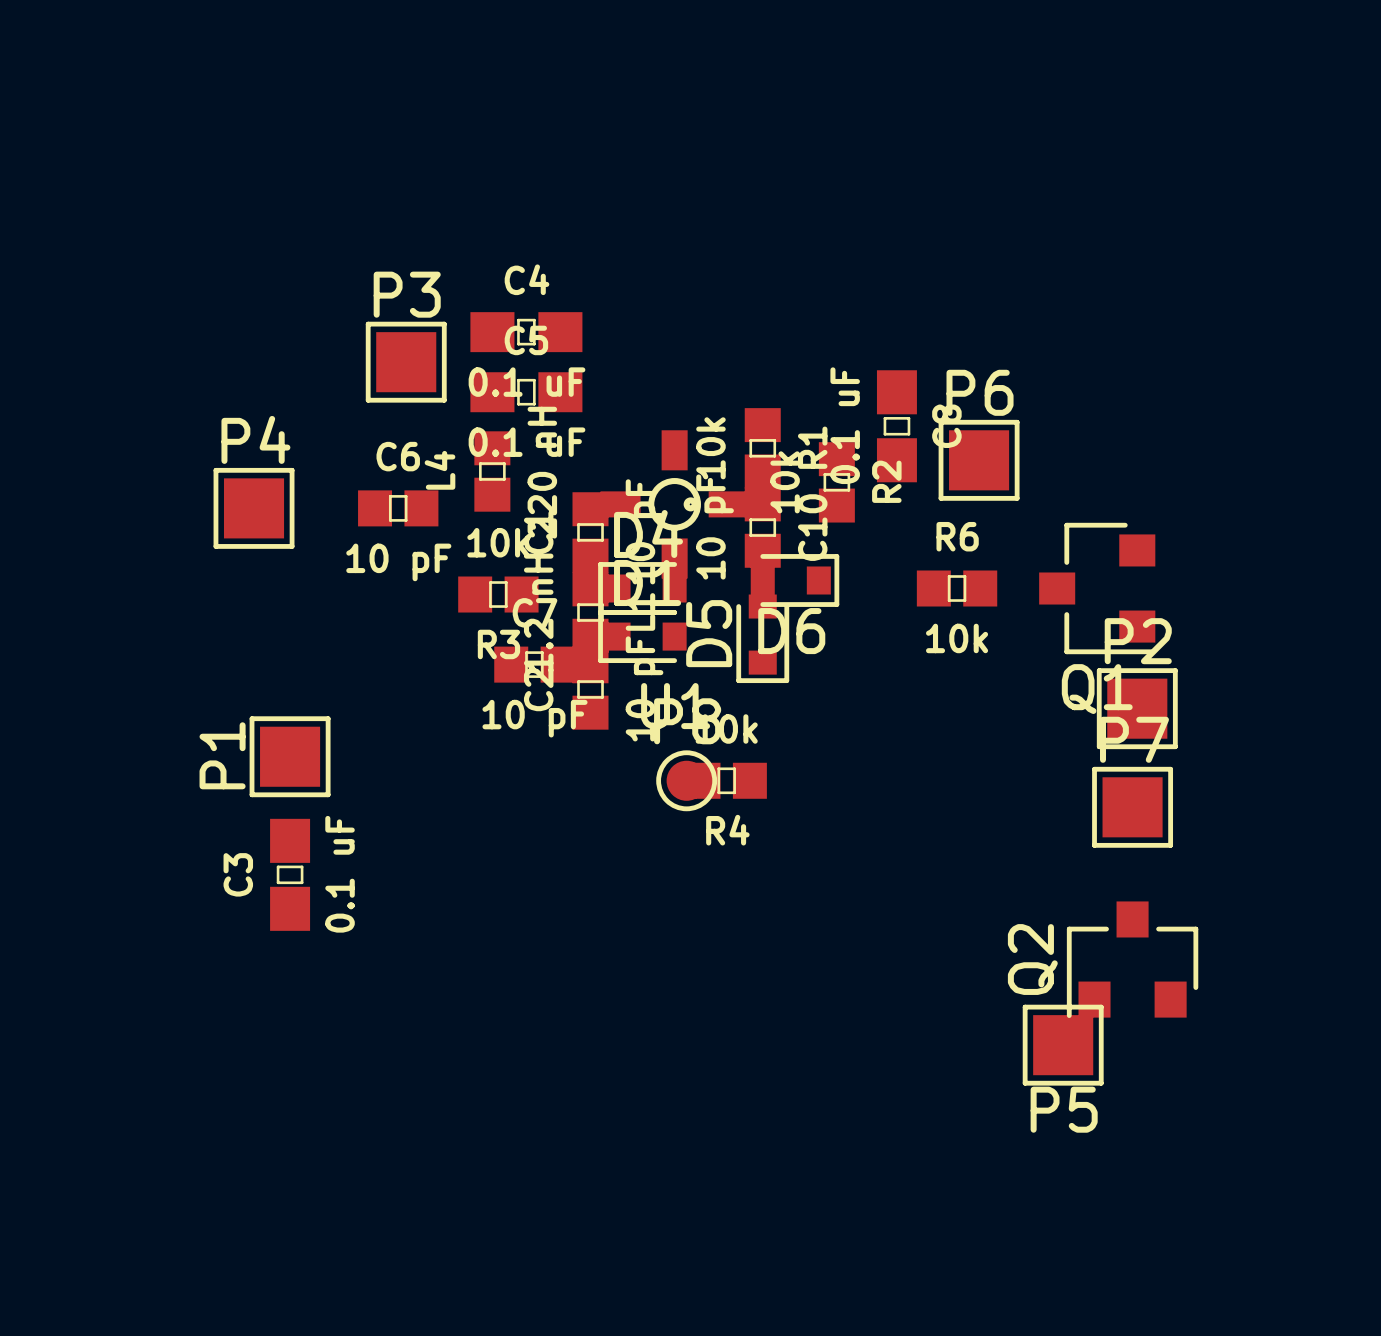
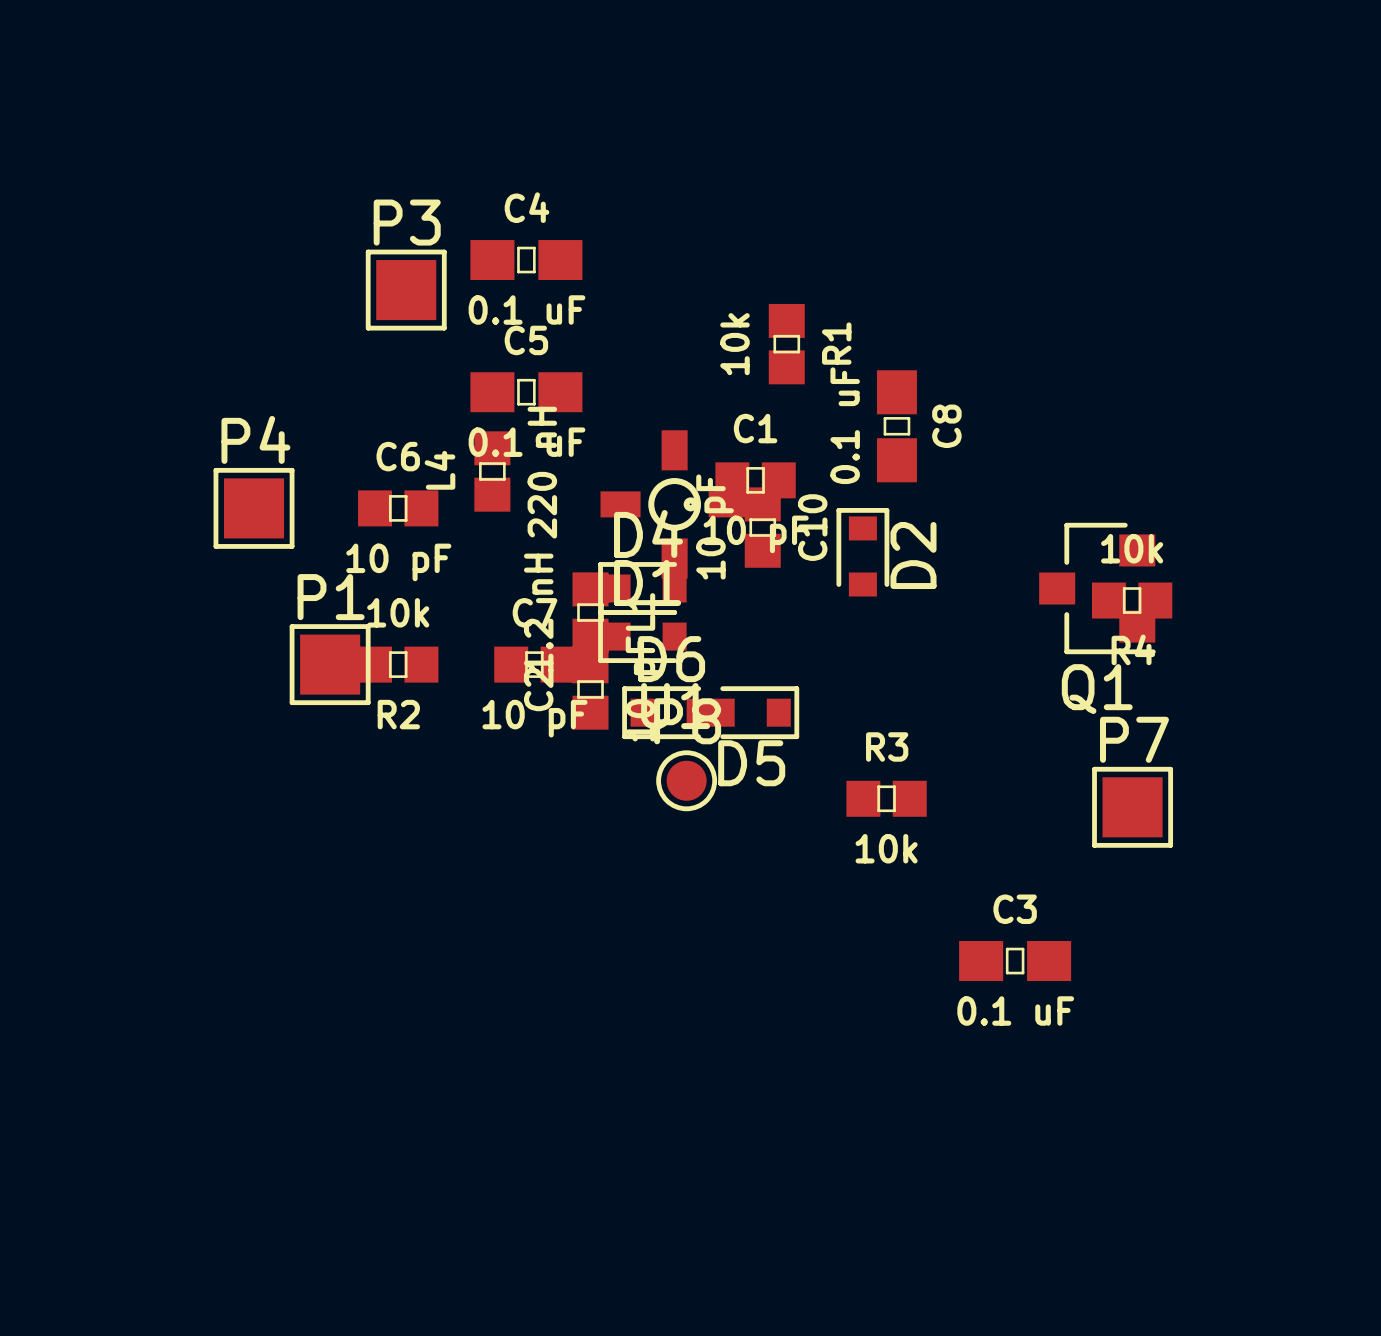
C4 position: (526, 332) -> (526, 260)
P3 position: (406, 362) -> (406, 290)
R1 position: (762, 448) -> (786, 344)
P6: (979, 460) -> none
R2 rotation: 0° (836, 482) -> 90° clockwise (398, 664)
R2 position: (836, 482) -> (398, 664)
C1 rotation: 0° (590, 532) -> 90° clockwise (755, 480)
C1 position: (590, 532) -> (755, 480)
R3 value position: 10k (498, 542) -> 10k (886, 848)
D2: none -> (862, 552)
D6 rotation: 0° (795, 580) -> 180° (666, 712)
D6 position: (795, 580) -> (666, 712)
R6: 10k (957, 588) -> none
R3 position: (498, 594) -> (886, 798)
D5 rotation: 0° (762, 638) -> 90° counterclockwise (754, 712)
D5 position: (762, 638) -> (754, 712)
R3 name position: R3 (498, 644) -> R3 (887, 746)
P2: (1137, 708) -> none
P1 name rotation: 0° (222, 755) -> 90° clockwise (331, 597)
P1 position: (290, 756) -> (330, 664)
R4 position: (726, 780) -> (1132, 600)
C3 rotation: 0° (290, 874) -> 90° clockwise (1015, 961)
C3 position: (290, 874) -> (1015, 961)
Q2: (1132, 959) -> none
P5: (1063, 1045) -> none

